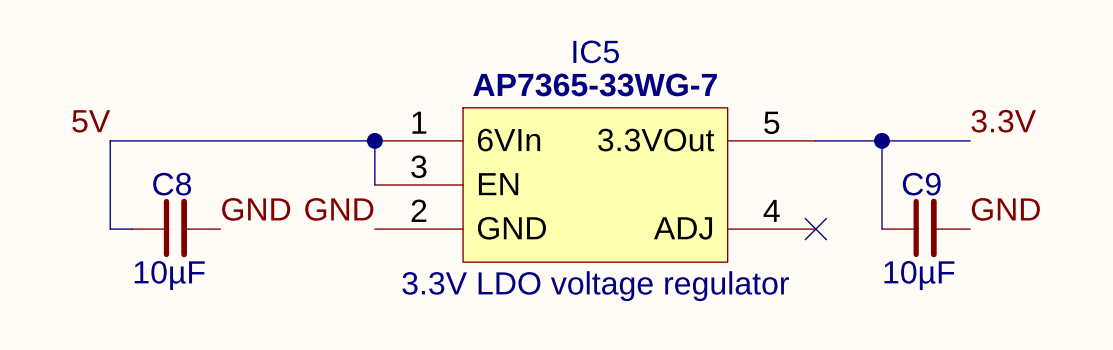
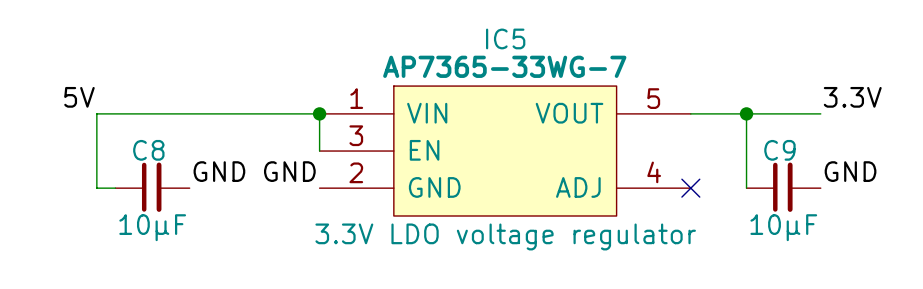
IC5 pin name: 6VIn (509, 140) -> VIN (427, 113)
IC5 pin name: 3.3VOut (656, 140) -> VOUT (569, 113)

